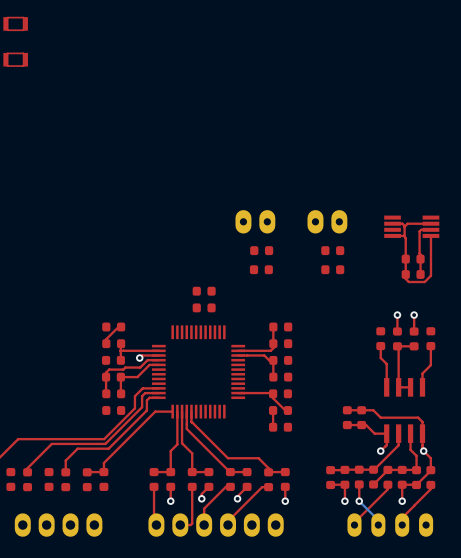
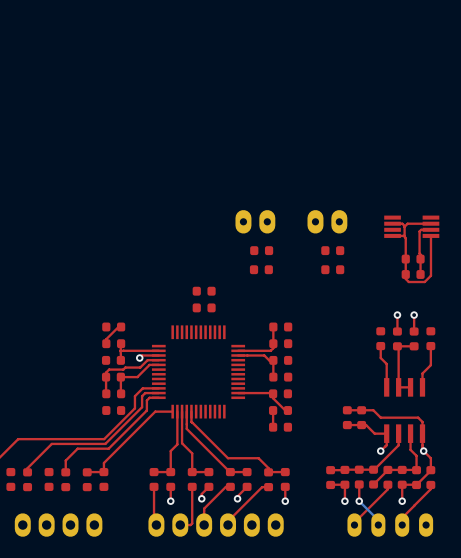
part: (15, 23) -> none
part: (15, 59) -> none

